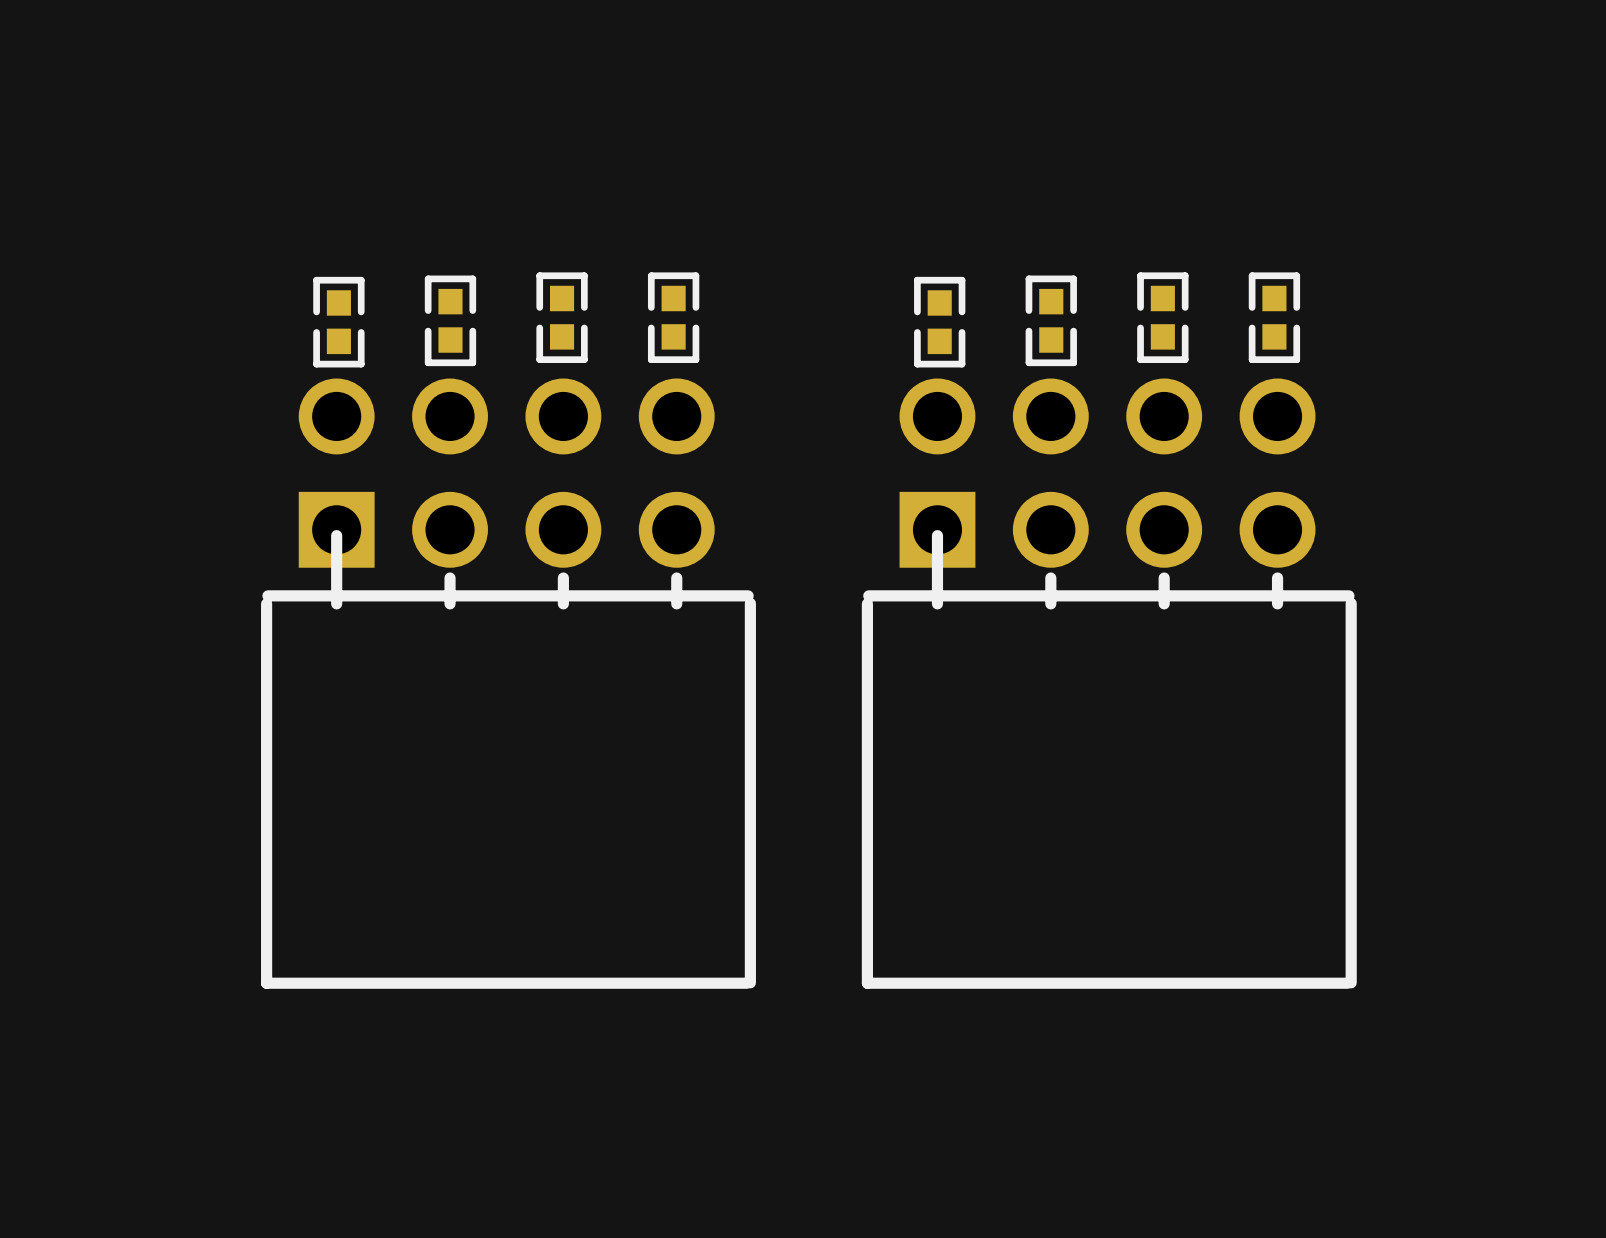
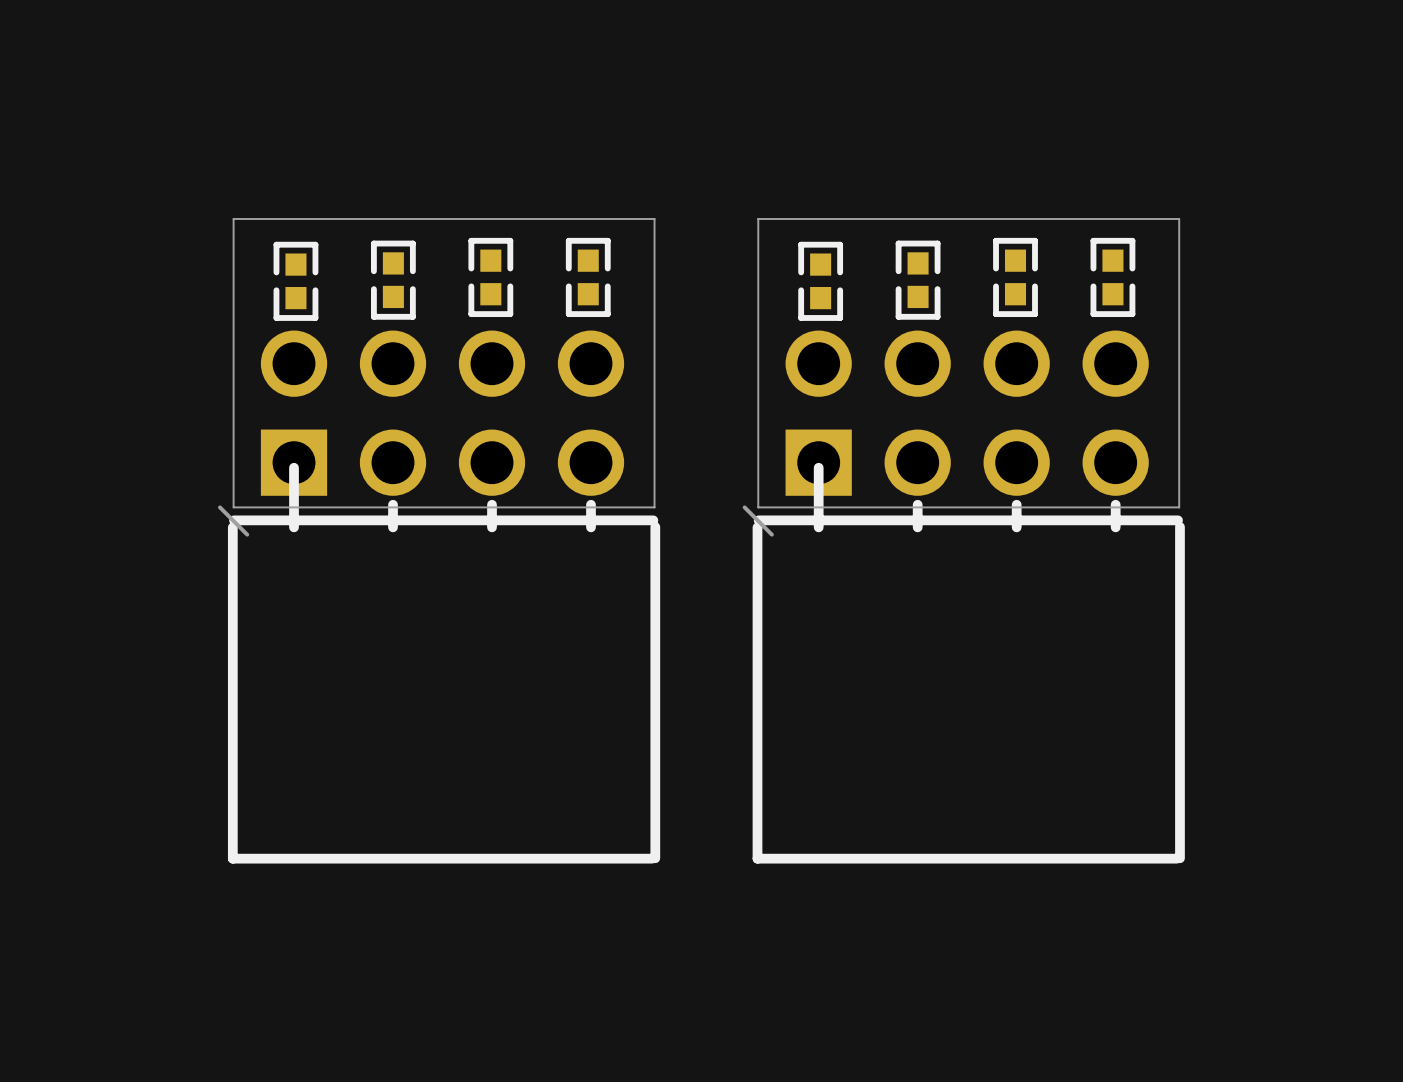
board edge: none -> (233, 218) (654, 218) (654, 507) (233, 507) (233, 218)
board edge: none -> (758, 218) (1179, 218) (1179, 507) (758, 507) (758, 218)
board edge: none -> (219, 507) (247, 534)
board edge: none -> (744, 507) (771, 534)

